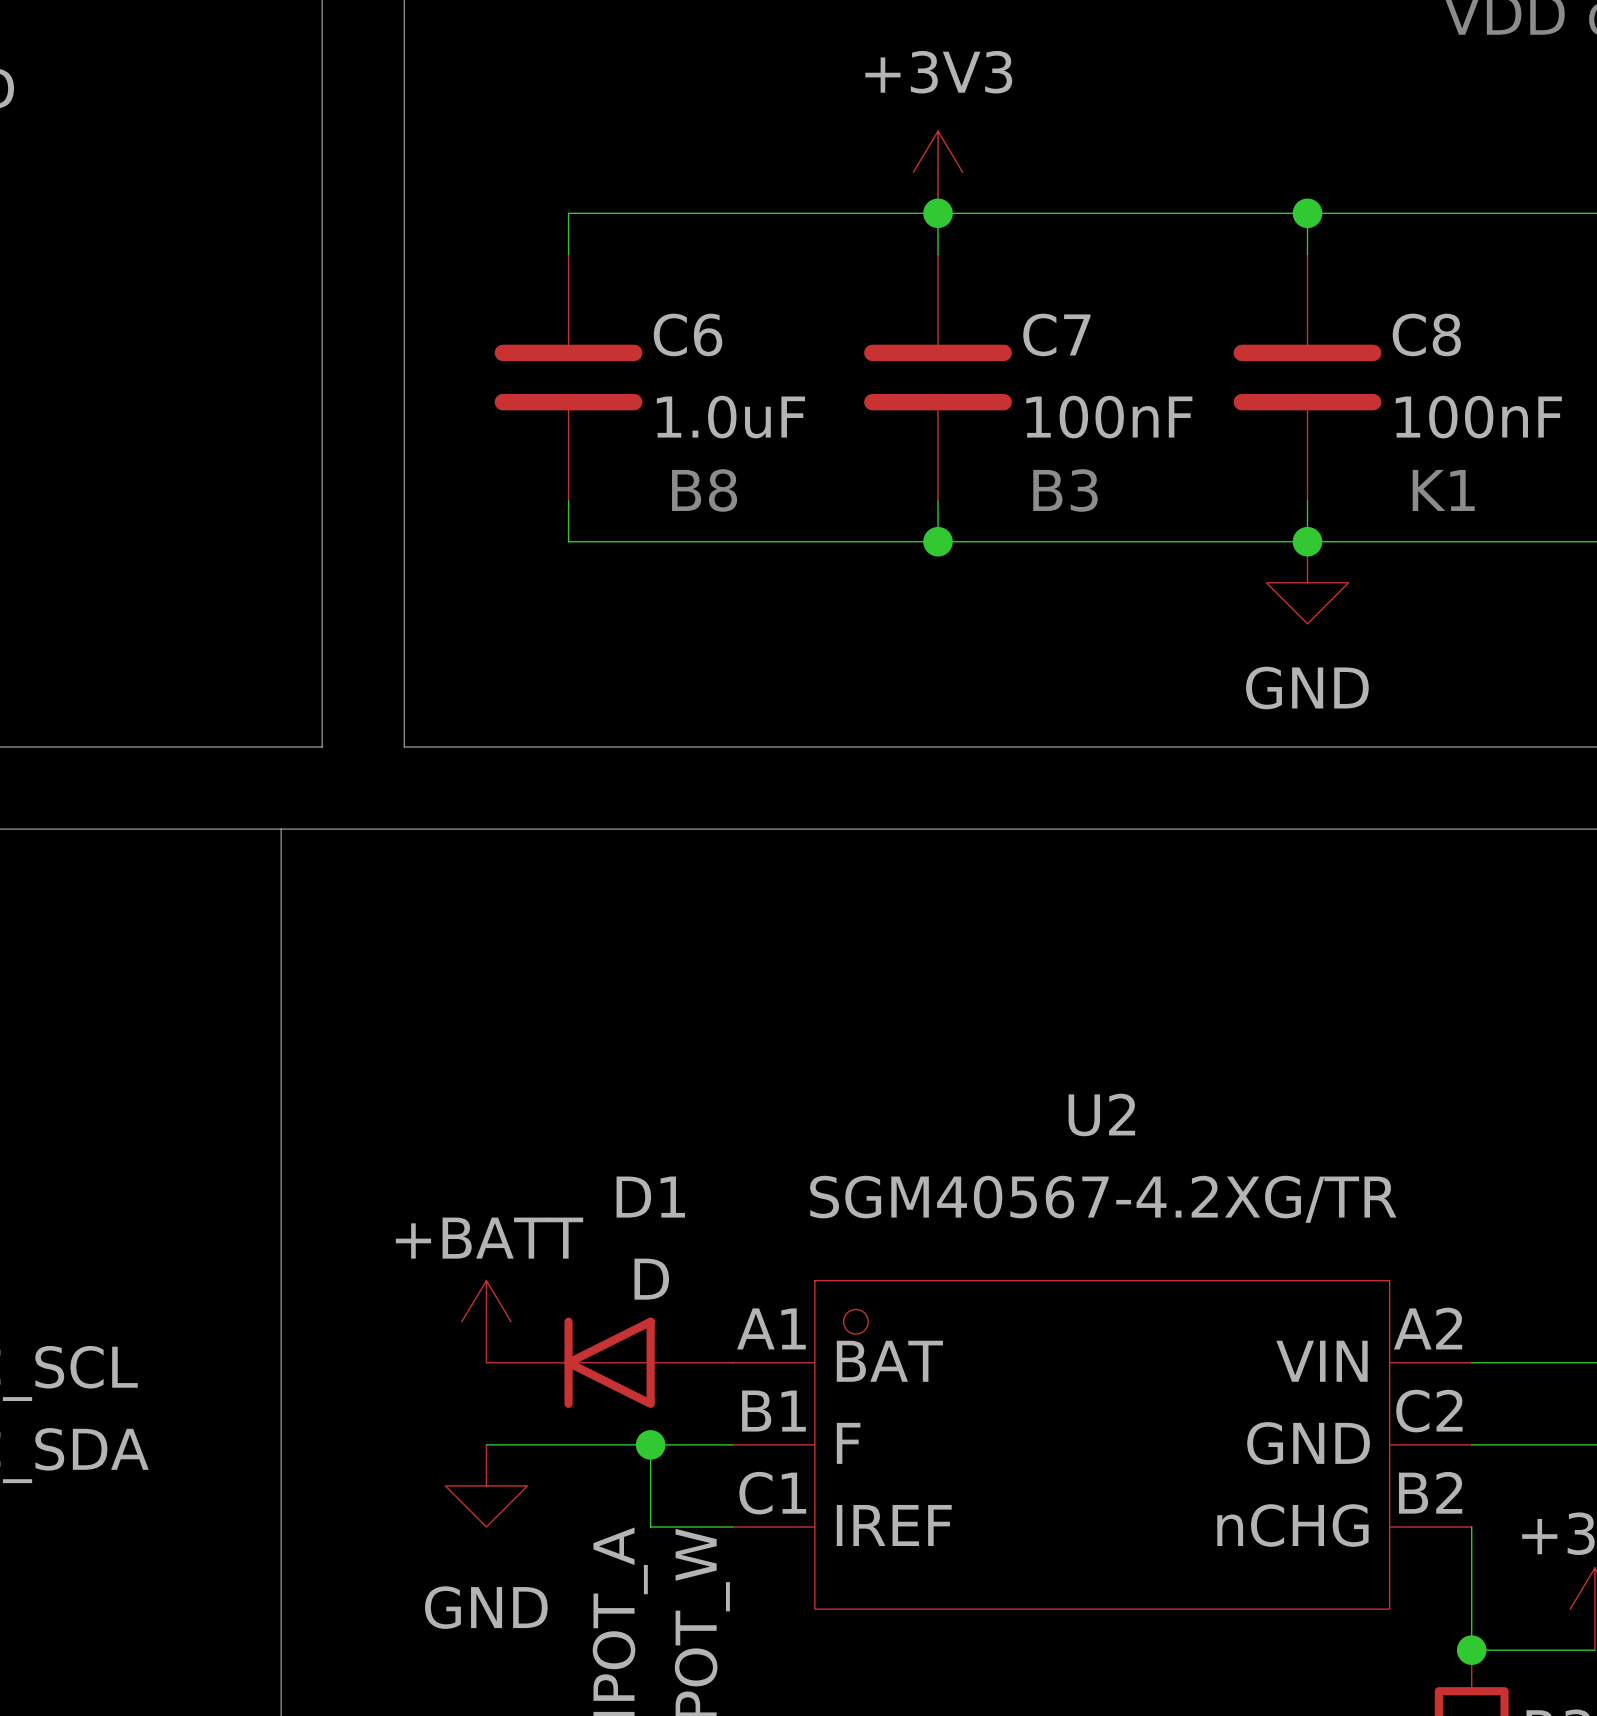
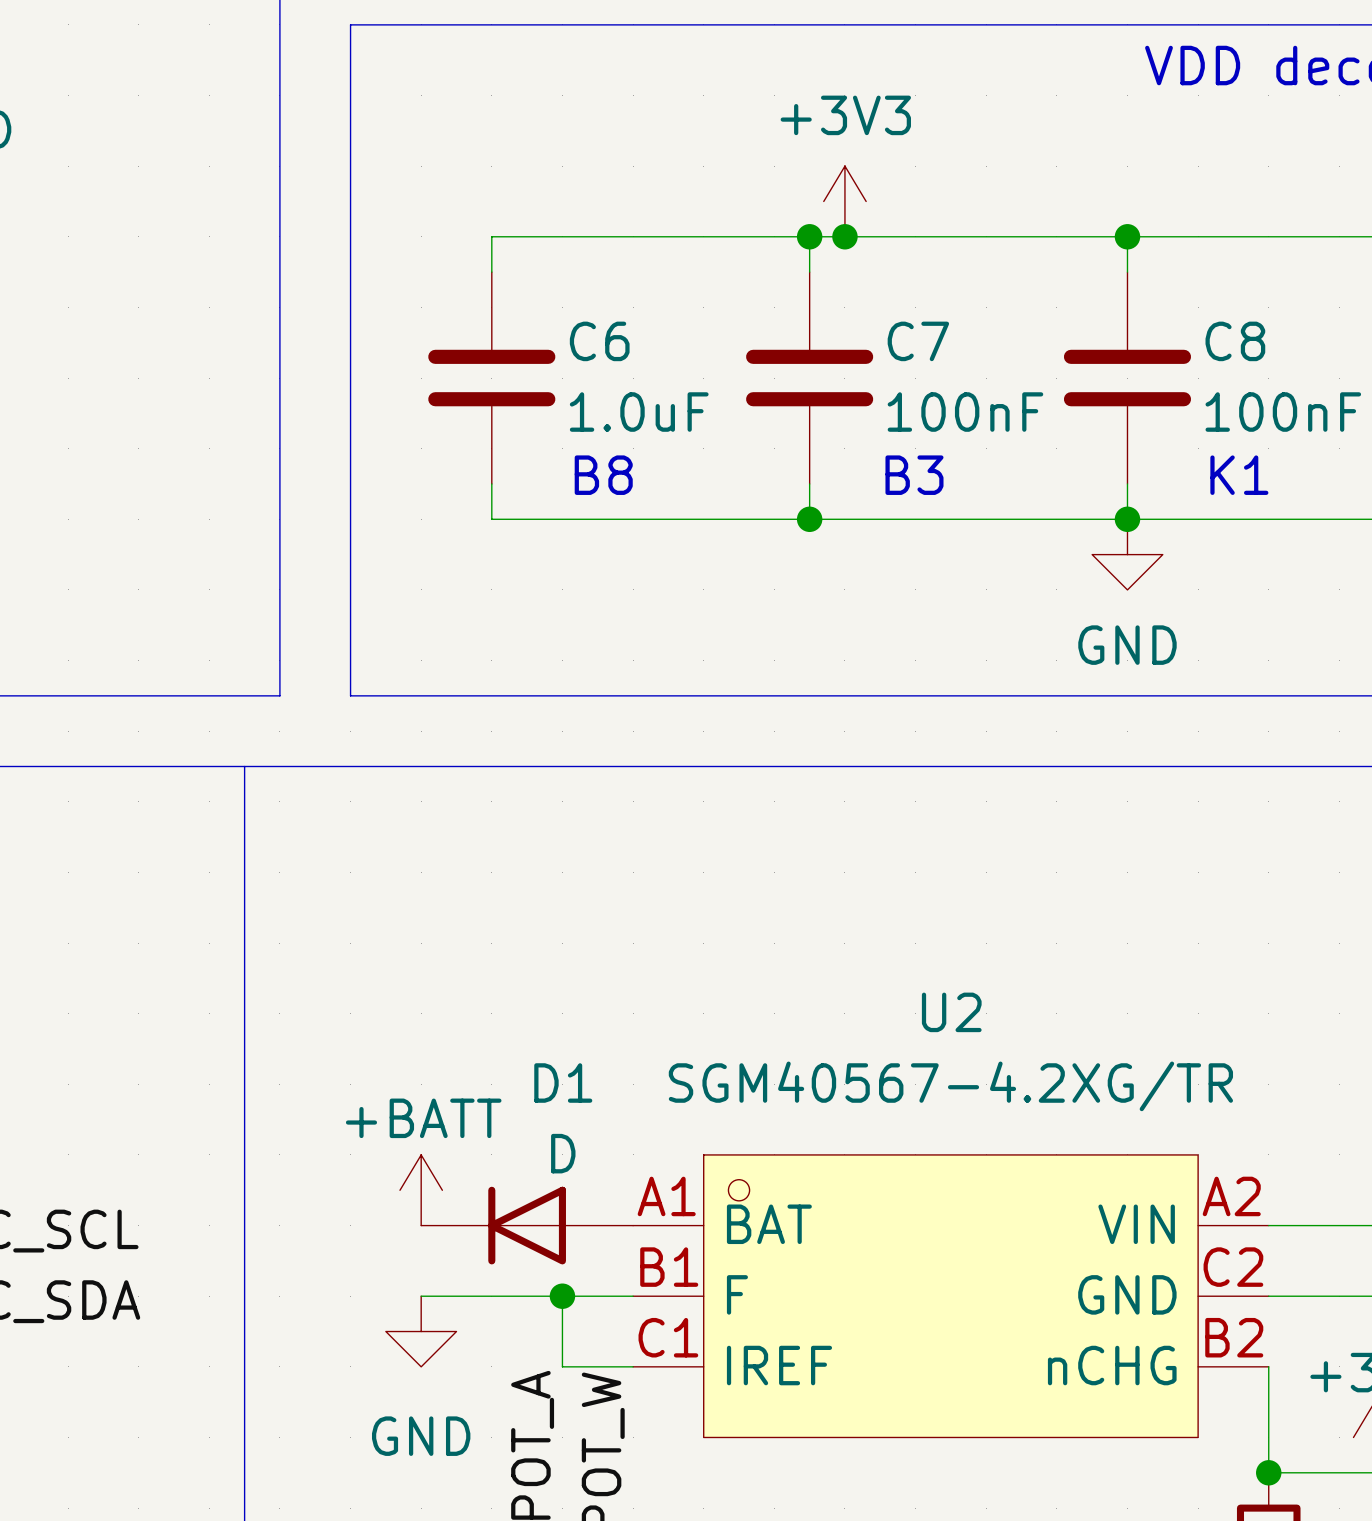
power symbol position: +3V3 (938, 172) -> +3V3 (844, 201)
junction: none -> (844, 236)

